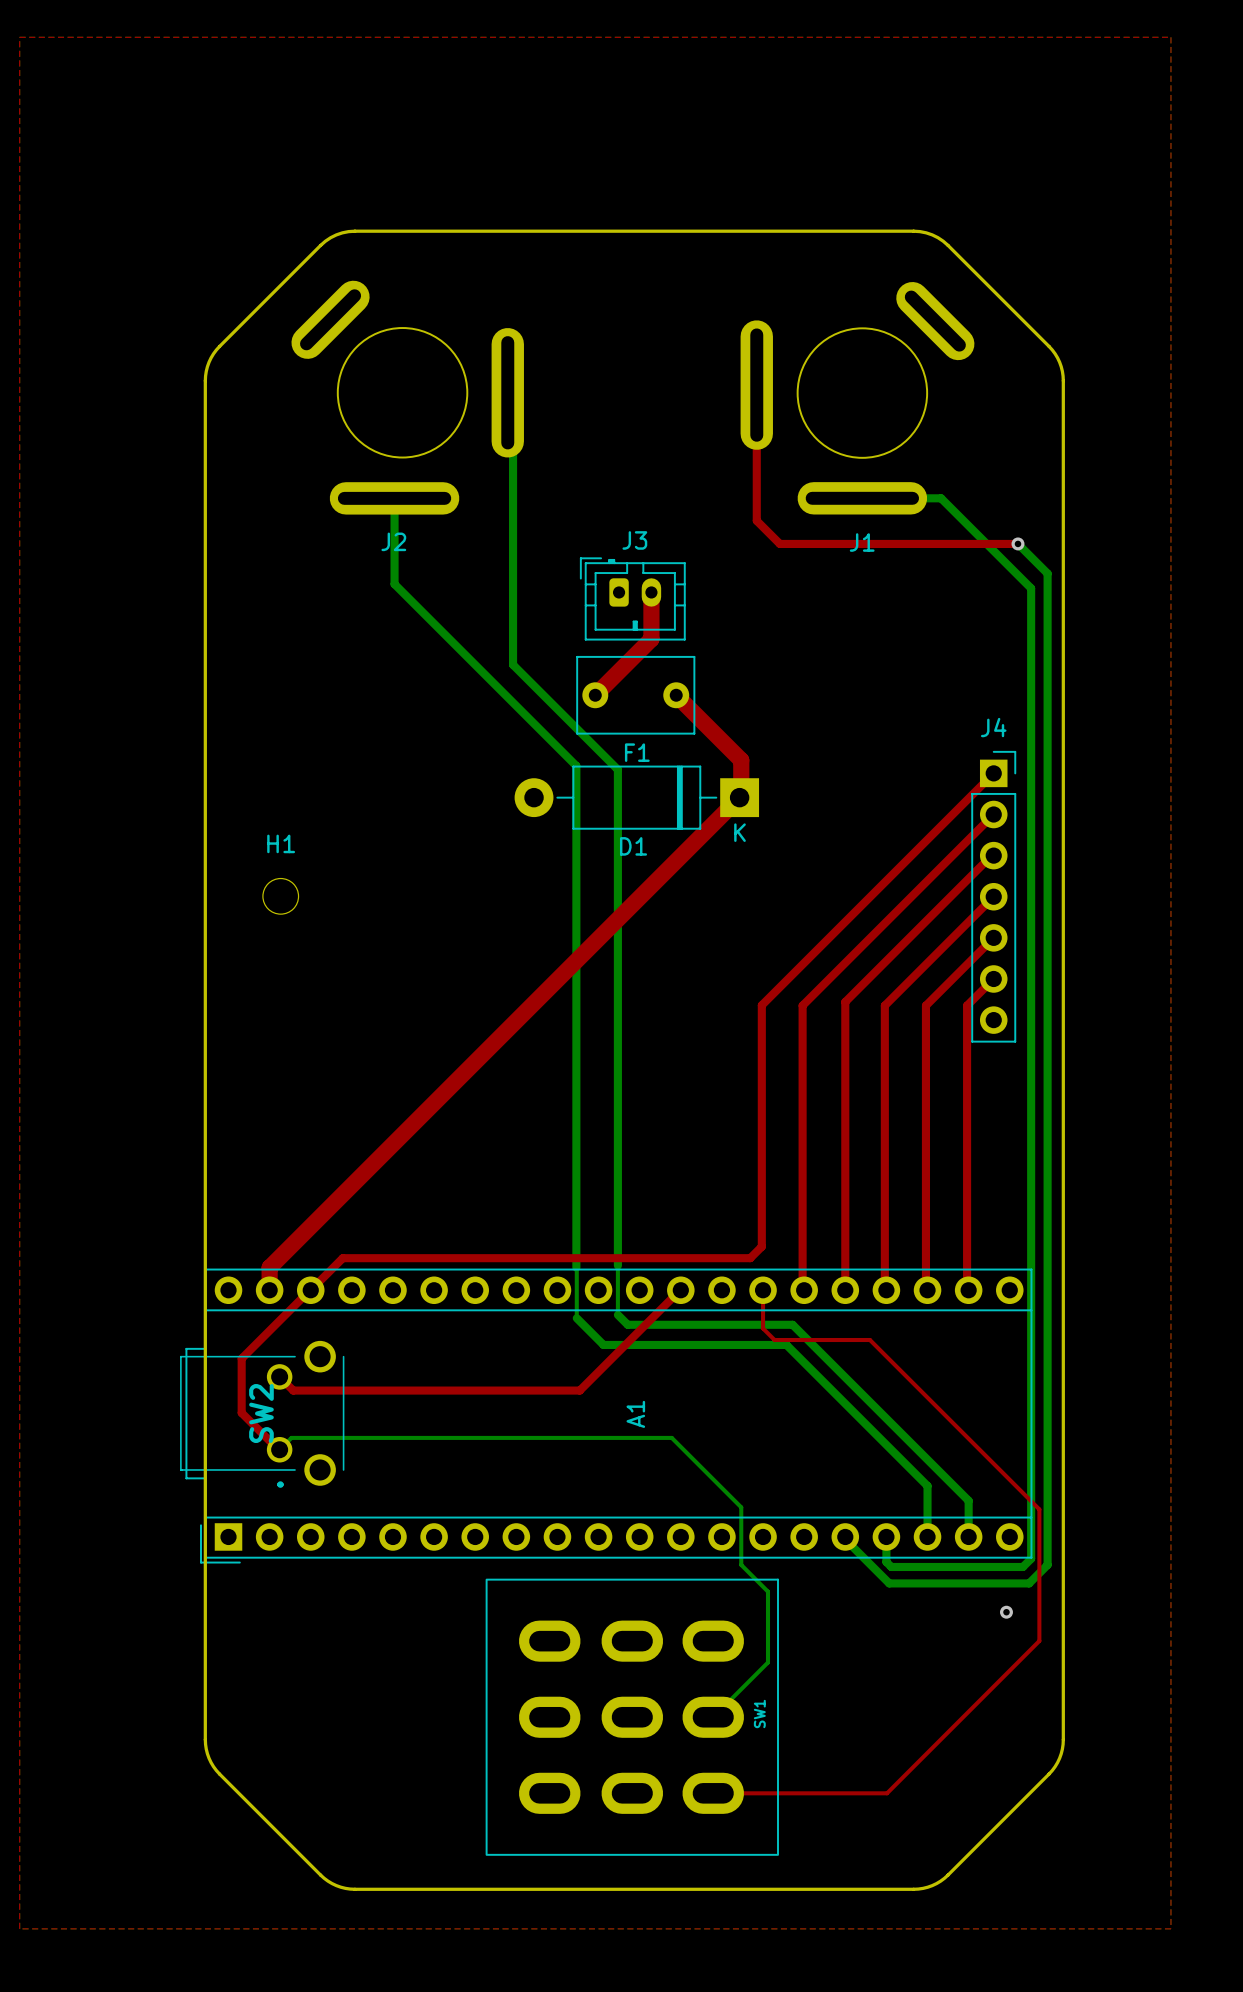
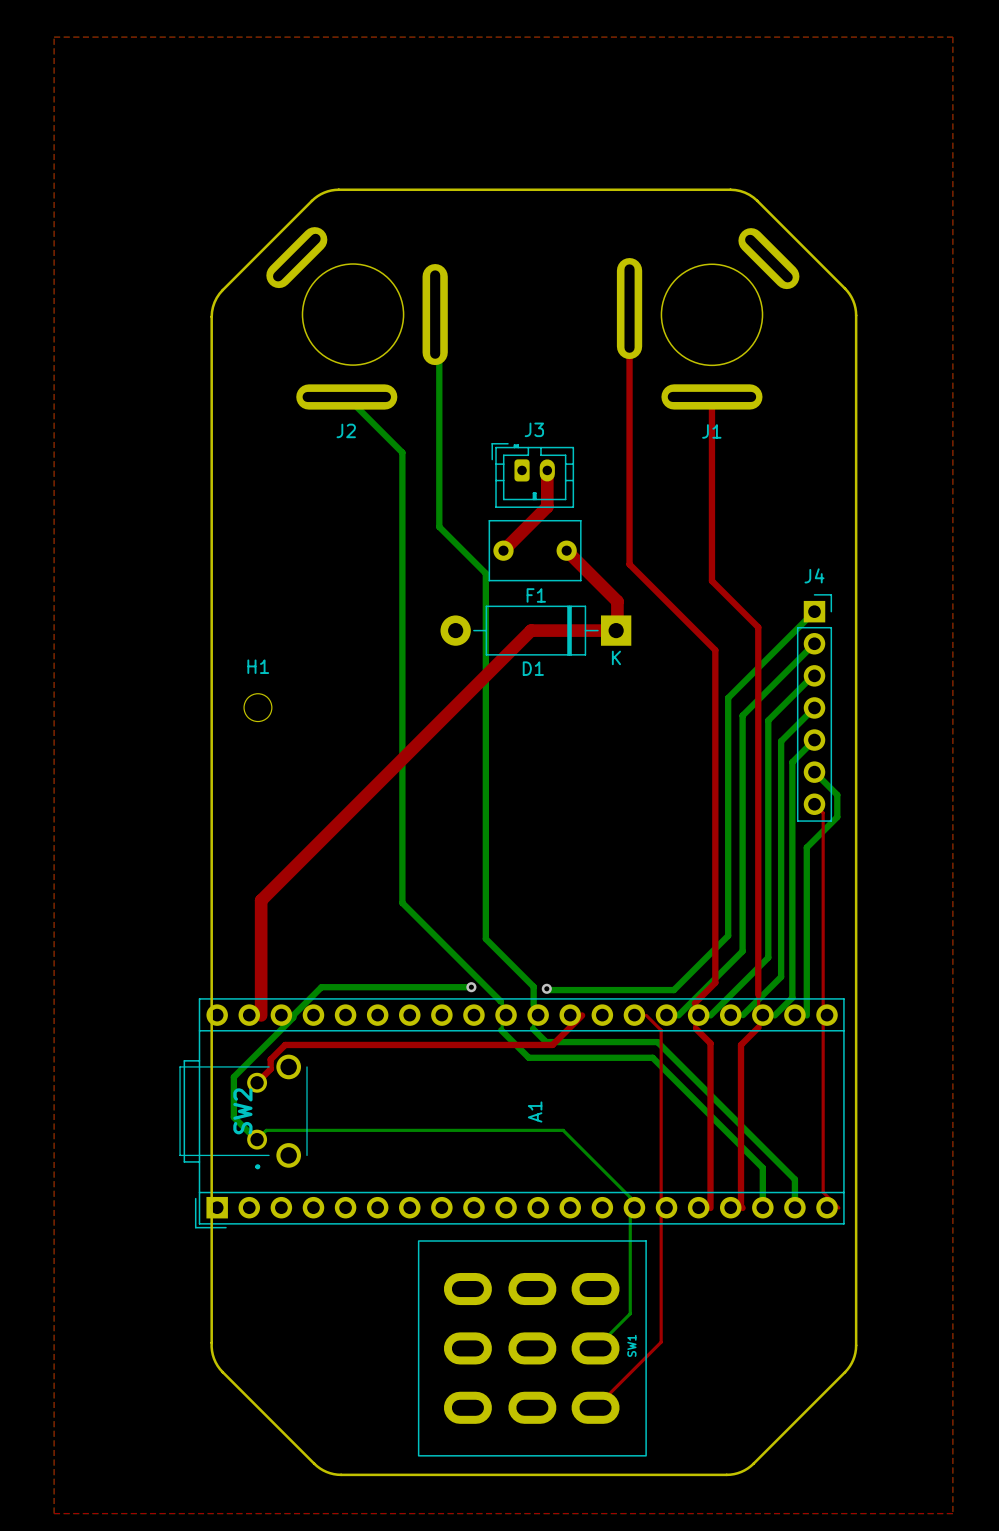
board edge: (354, 231) (920, 231) (932, 234) (948, 245) (1049, 346) (1061, 366) (1063, 380) (1063, 1744) (1059, 1758) (1049, 1774) (948, 1875) (927, 1887) (913, 1889) (345, 1888) (332, 1883) (320, 1875) (219, 1774) (207, 1753) (205, 1739) (205, 376) (209, 362) (216, 350) (320, 245) (336, 234) (354, 231) -> (338, 189) (324, 192) (311, 200) (222, 290) (216, 297) (212, 311) (212, 1354) (222, 1372) (314, 1463) (323, 1470) (333, 1474) (726, 1474) (737, 1473) (753, 1463) (845, 1372) (851, 1363) (855, 1349) (856, 315) (854, 304) (845, 288) (757, 200) (740, 191) (338, 189)
bottom track: (394, 498) (394, 584) (576, 765) (576, 1318) (603, 1344) (627, 1344) -> (346, 396) (402, 452) (402, 902) (500, 1001)
top track: none -> (711, 396) (711, 581) (758, 627) (758, 994)
bottom track: (862, 498) (941, 498) (1031, 588) (1031, 1558) (1022, 1566) (891, 1566) (886, 1562) (886, 1536) -> none
top track: (756, 520) (779, 543) (1017, 543) -> (629, 414) (629, 564) (715, 650) (715, 982) (694, 1003)
bottom track: (1017, 543) (1047, 573) (1047, 1564) (1029, 1583) (889, 1583) (845, 1539) (845, 1536) -> none
via: (1017, 543) -> none
bottom track: (572, 724) (617, 769) (617, 1314) (627, 1324) (649, 1324) -> (485, 573) (485, 938) (533, 986) (533, 1028) (546, 1042)
top track: (993, 773) (761, 1005) (761, 1246) (750, 1258) (342, 1258) (241, 1358) (241, 1412) (279, 1449) -> none
bottom track: none -> (814, 611) (728, 698) (728, 935) (673, 990) (546, 988)
top track: (739, 797) (269, 1267) (269, 1290) -> (616, 630) (531, 630) (261, 900) (261, 1015)
top track: (993, 814) (802, 1005) (802, 1288) (804, 1290) -> none
bottom track: none -> (814, 643) (742, 715) (742, 951) (678, 1015)
top track: (993, 855) (845, 1002) (845, 1290) -> none
bottom track: none -> (814, 675) (768, 720) (768, 957) (710, 1015)
top track: (993, 896) (884, 1005) (884, 1288) (886, 1290) -> none
bottom track: none -> (814, 707) (781, 741) (781, 976) (742, 1015)
top track: (993, 937) (925, 1005) (925, 1288) (927, 1290) -> none
bottom track: none -> (814, 740) (792, 762) (792, 997) (774, 1015)
top track: (993, 978) (967, 1005) (967, 1288) (968, 1290) -> none
bottom track: none -> (814, 772) (837, 794) (837, 817) (806, 847) (806, 1015)
top track: none -> (814, 804) (823, 812) (823, 1192) (838, 1208)
bottom track: none -> (471, 987) (321, 987) (233, 1077) (233, 1117) (257, 1139)
via: none -> (471, 987)
via: none -> (546, 988)
top track: none -> (758, 995) (758, 1027) (741, 1044) (741, 1206) (742, 1208)
bottom track: none -> (500, 1001) (502, 1002) (501, 1030) (528, 1057)
top track: none -> (694, 1003) (694, 1027) (710, 1043) (710, 1208)
top track: (680, 1290) (579, 1390) (293, 1390) (279, 1376) -> (582, 1015) (552, 1044) (285, 1044) (270, 1059) (270, 1069) (257, 1082)
top track: (763, 1290) (763, 1328) (774, 1340) (869, 1340) (1039, 1509) (1039, 1640) (887, 1793) (713, 1793) -> (646, 1015) (661, 1030) (661, 1342) (595, 1407)
bottom track: (741, 1507) (741, 1564) (767, 1591) (767, 1662) (757, 1672) -> (617, 1184) (630, 1197) (630, 1313)
via: (1006, 1612) -> none

